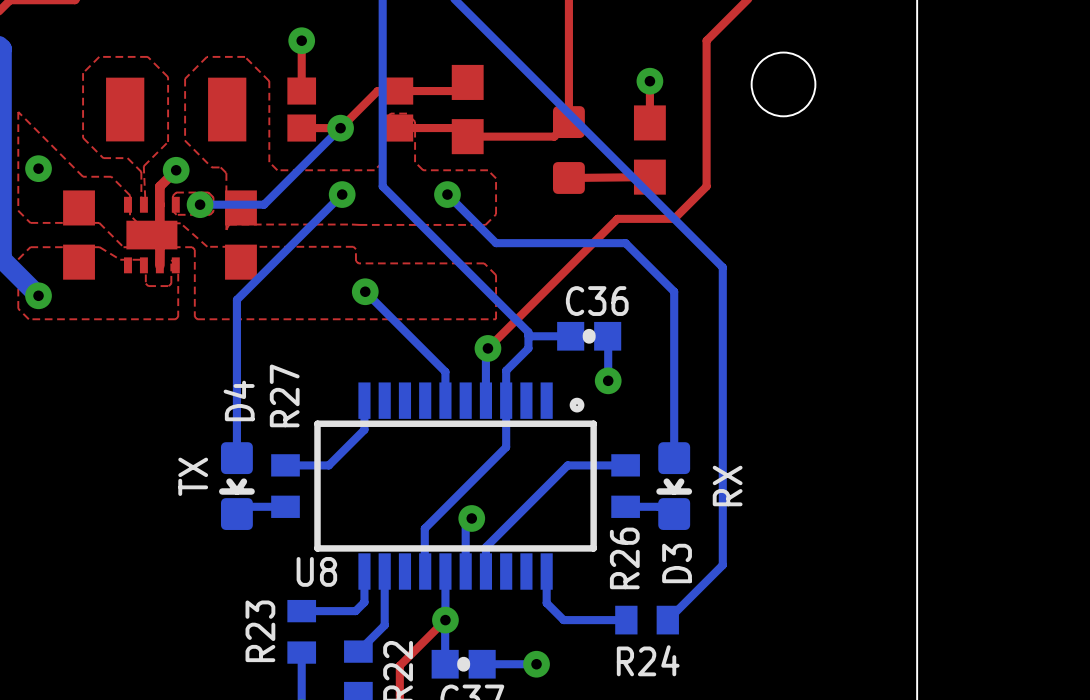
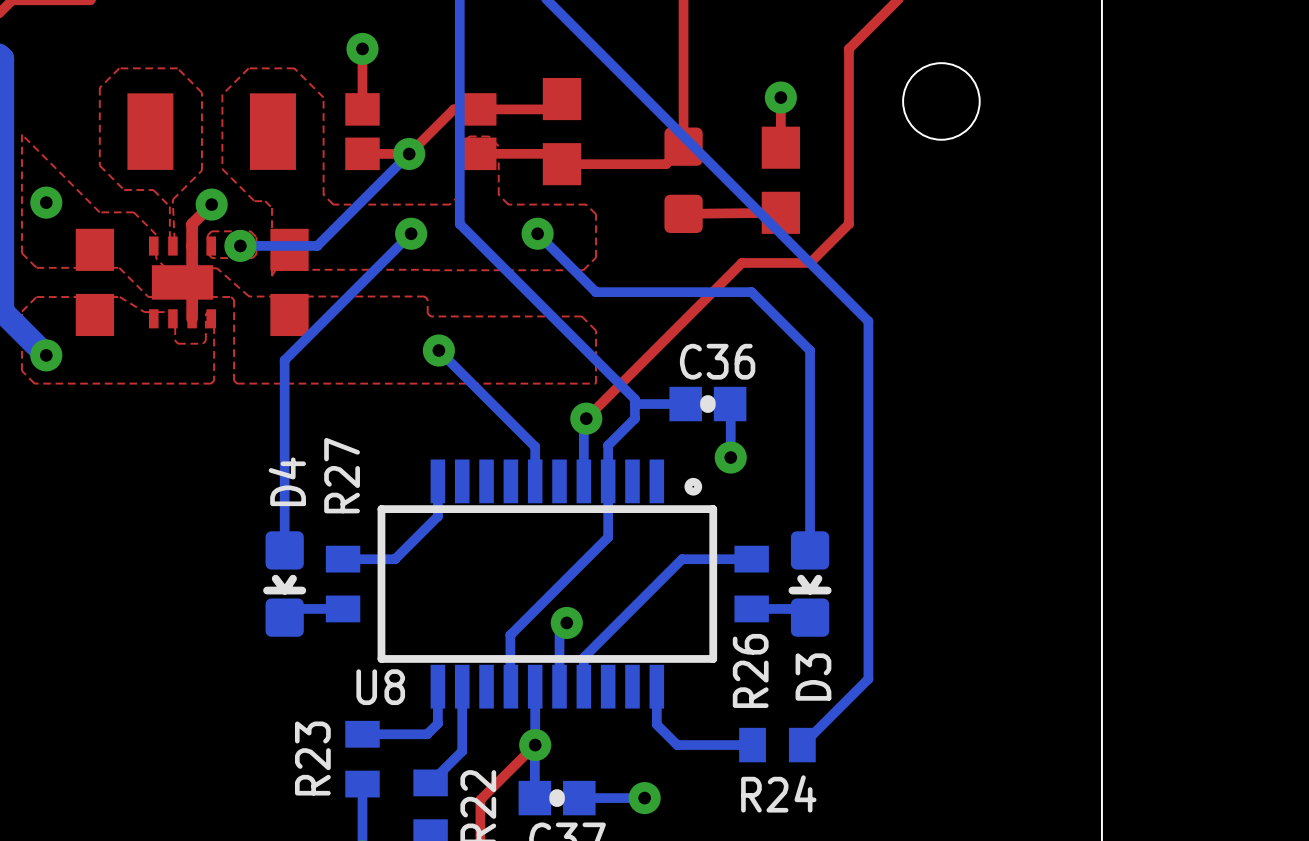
text: TX (193, 476) -> none
text: RX (727, 486) -> none

